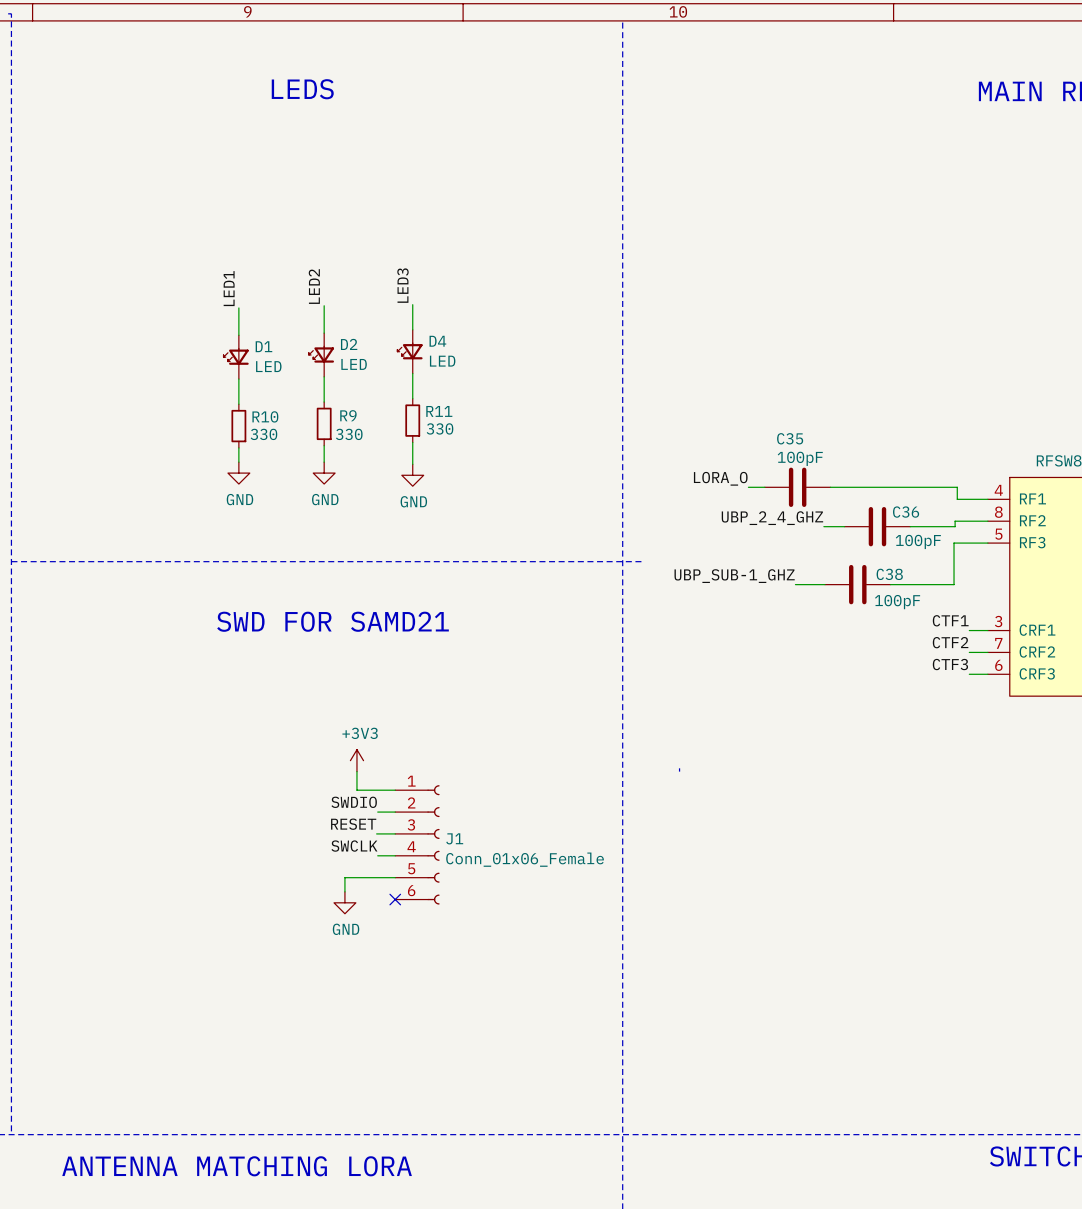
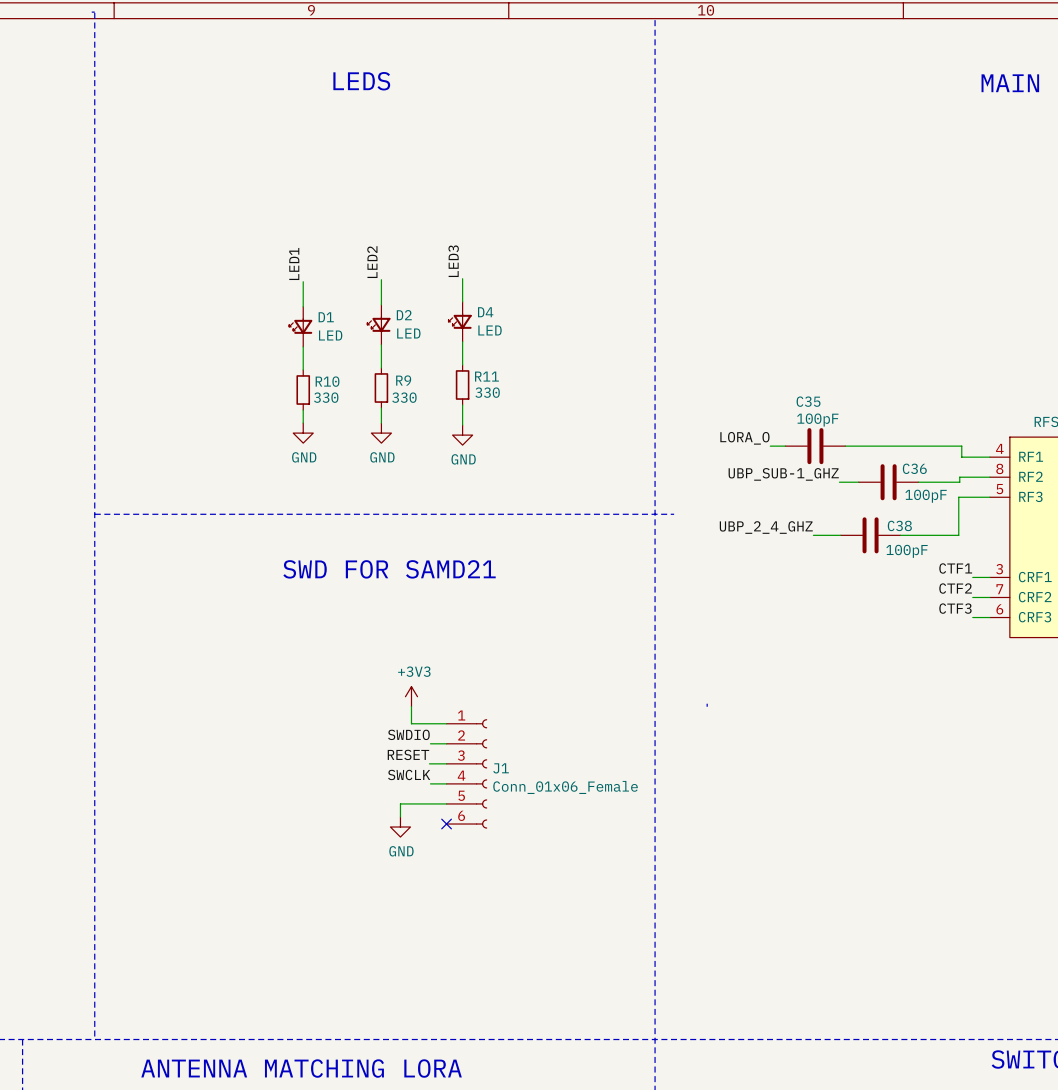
label: UBP_2_4_GHZ (772, 518) -> UBP_SUB-1_GHZ (783, 474)
label: UBP_SUB-1_GHZ (734, 576) -> UBP_2_4_GHZ (766, 527)

